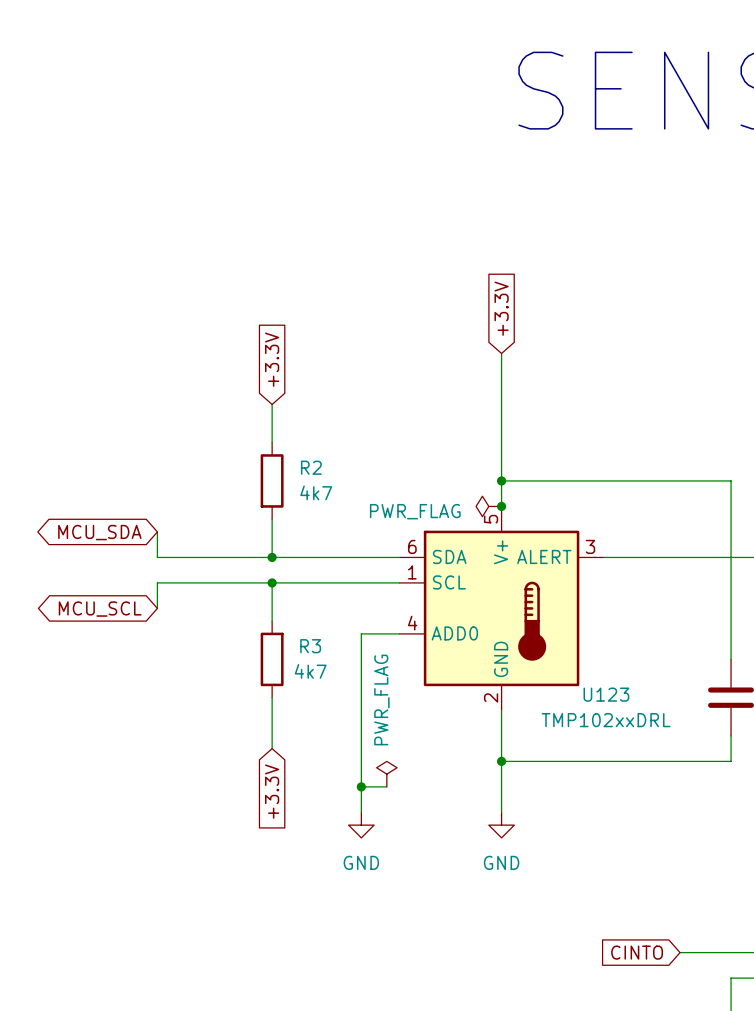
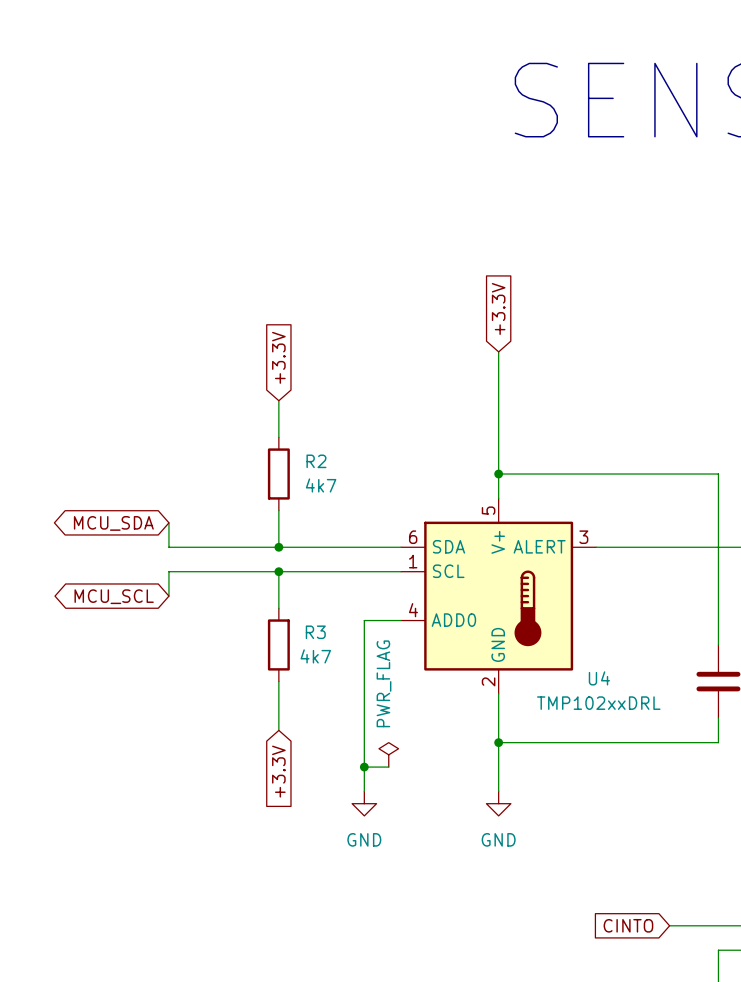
power symbol: PWR_FLAG (488, 506) -> none
junction: (501, 506) -> none
U123 name: U123 (606, 694) -> U4 (599, 678)

